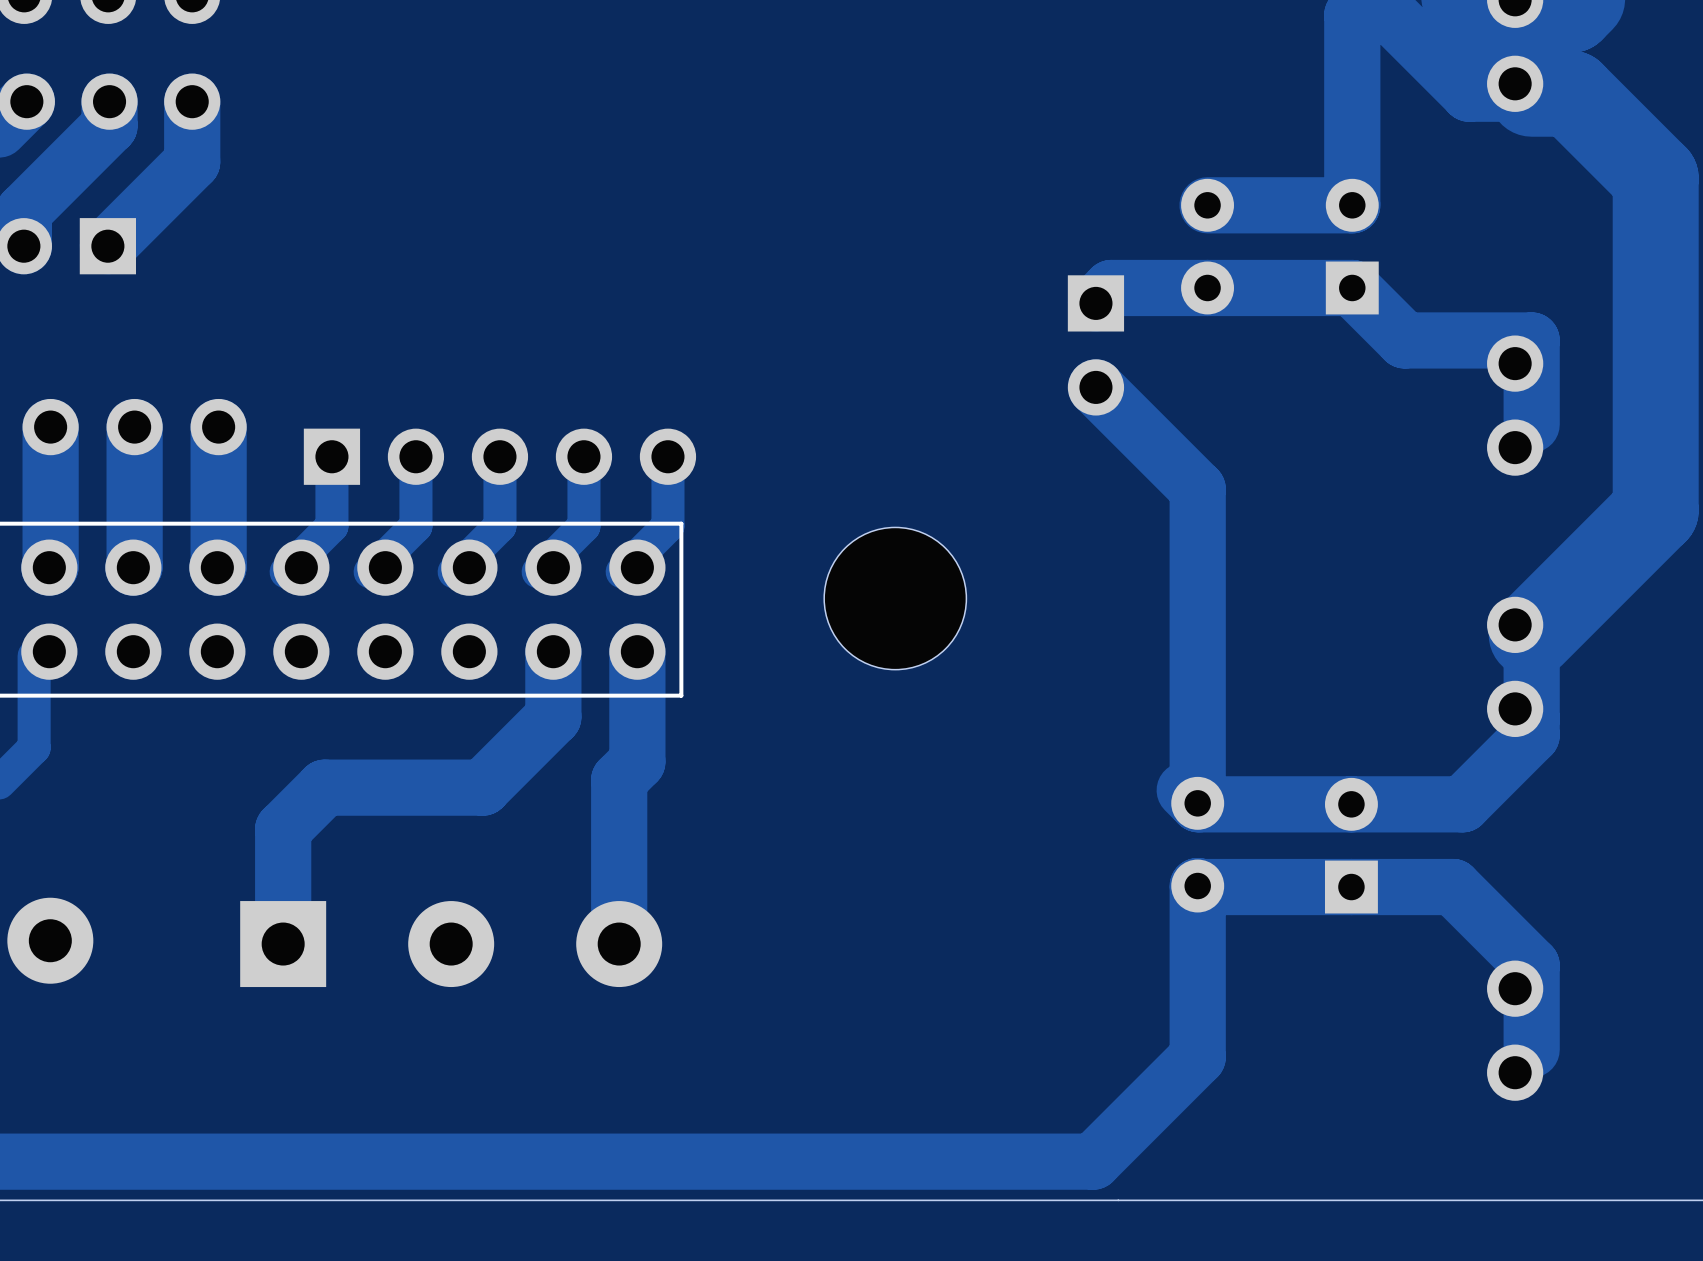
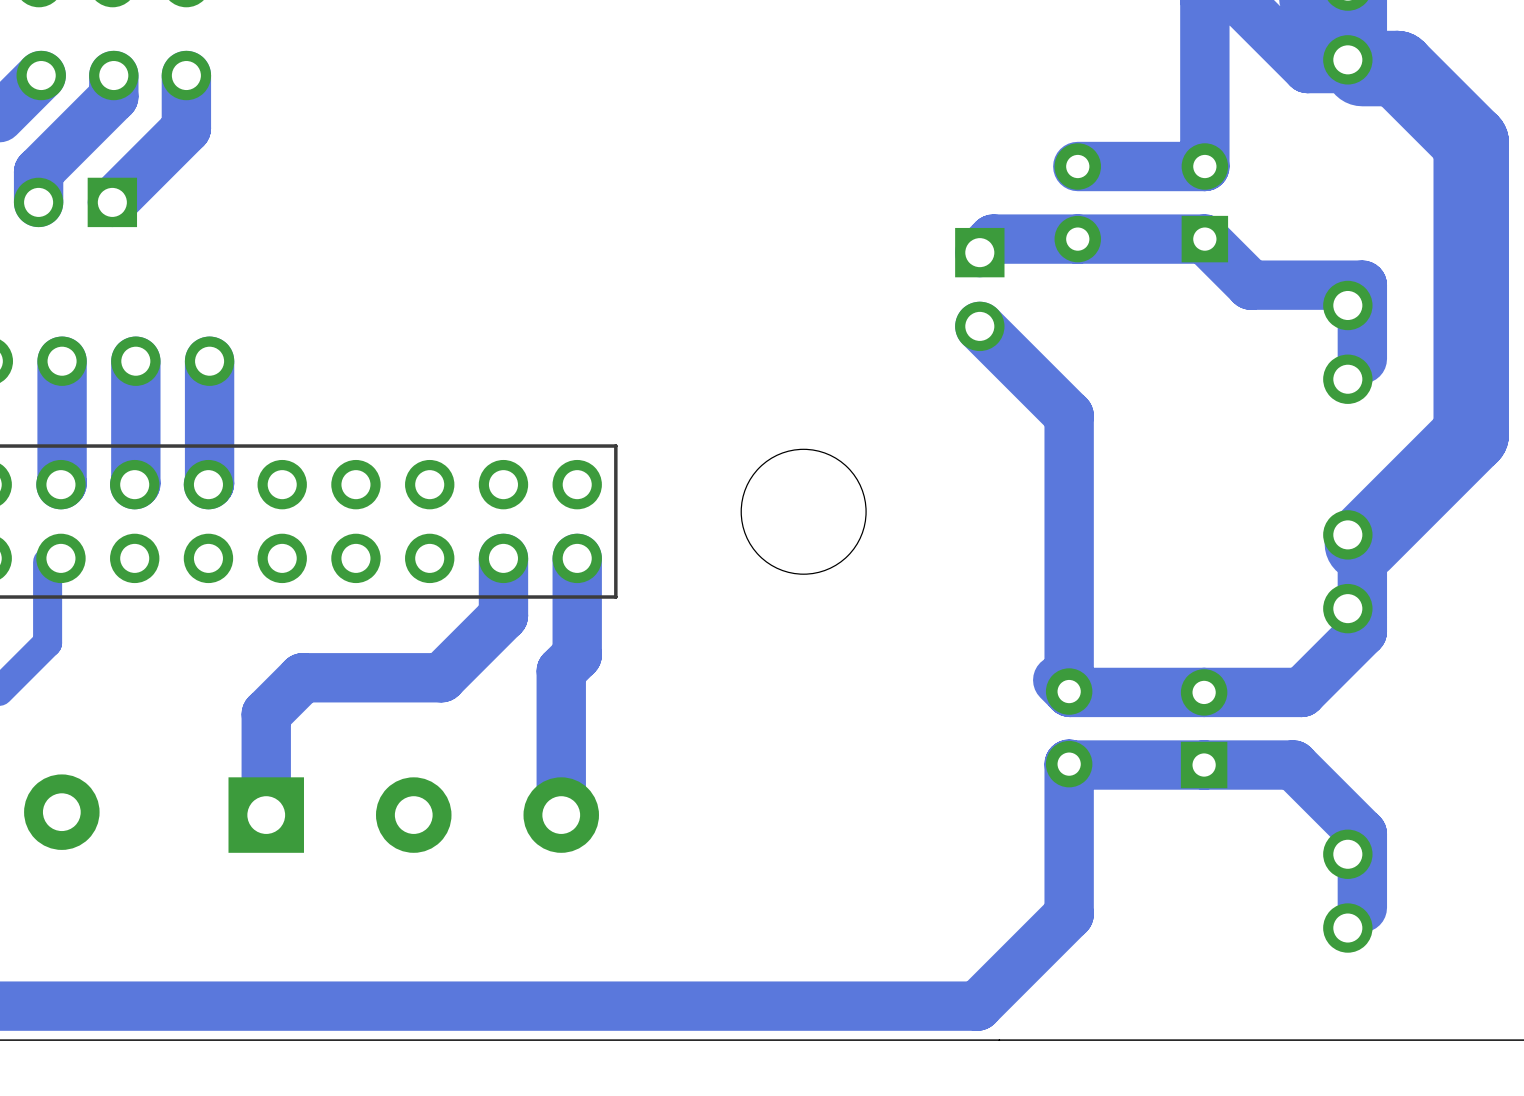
track: (331, 456) (331, 526) (286, 571) -> none
track: (415, 456) (415, 526) (370, 571) -> none
track: (499, 456) (499, 526) (454, 571) -> none
part: (499, 456) -> none
track: (583, 456) (583, 526) (538, 571) -> none
track: (667, 456) (667, 526) (622, 571) -> none

